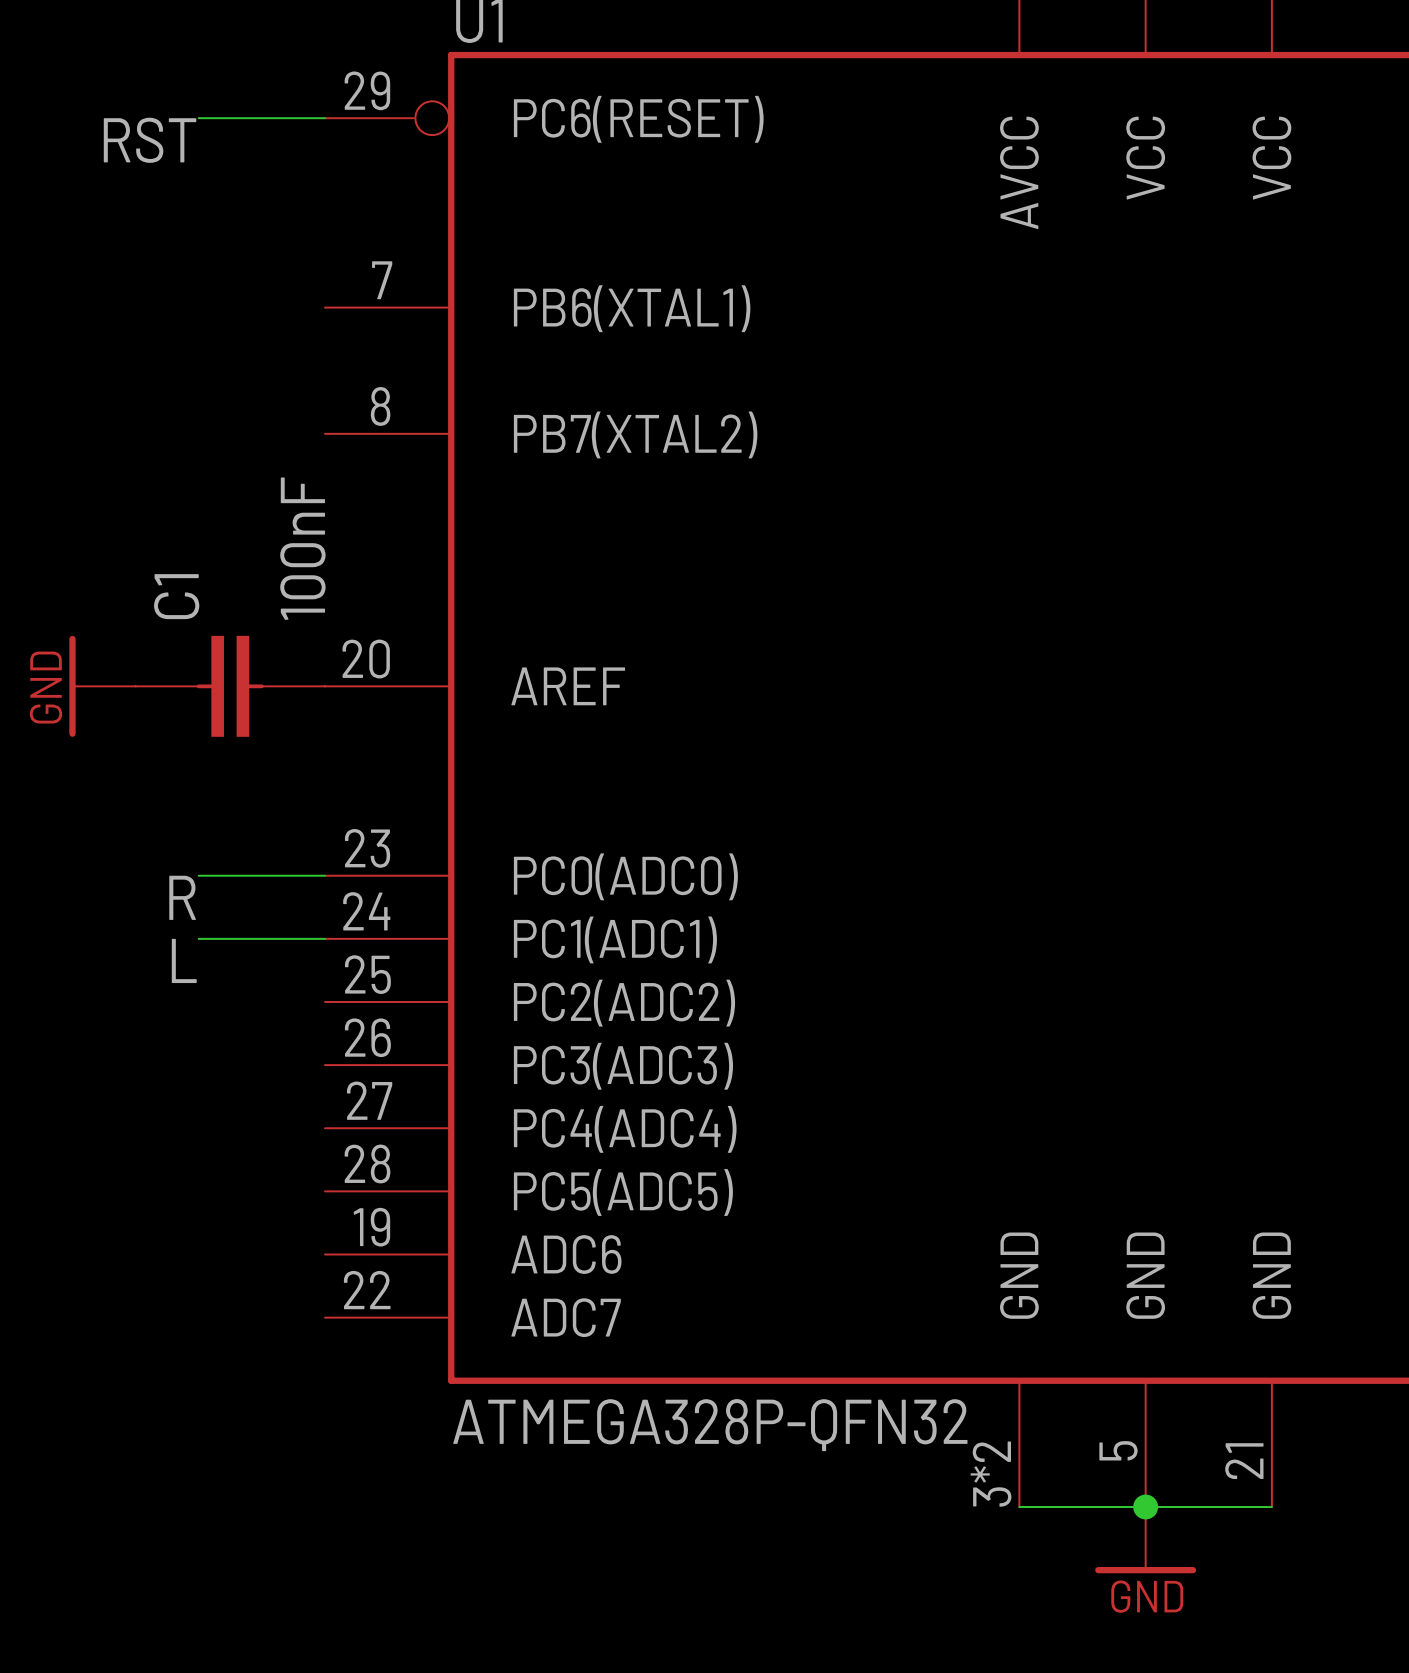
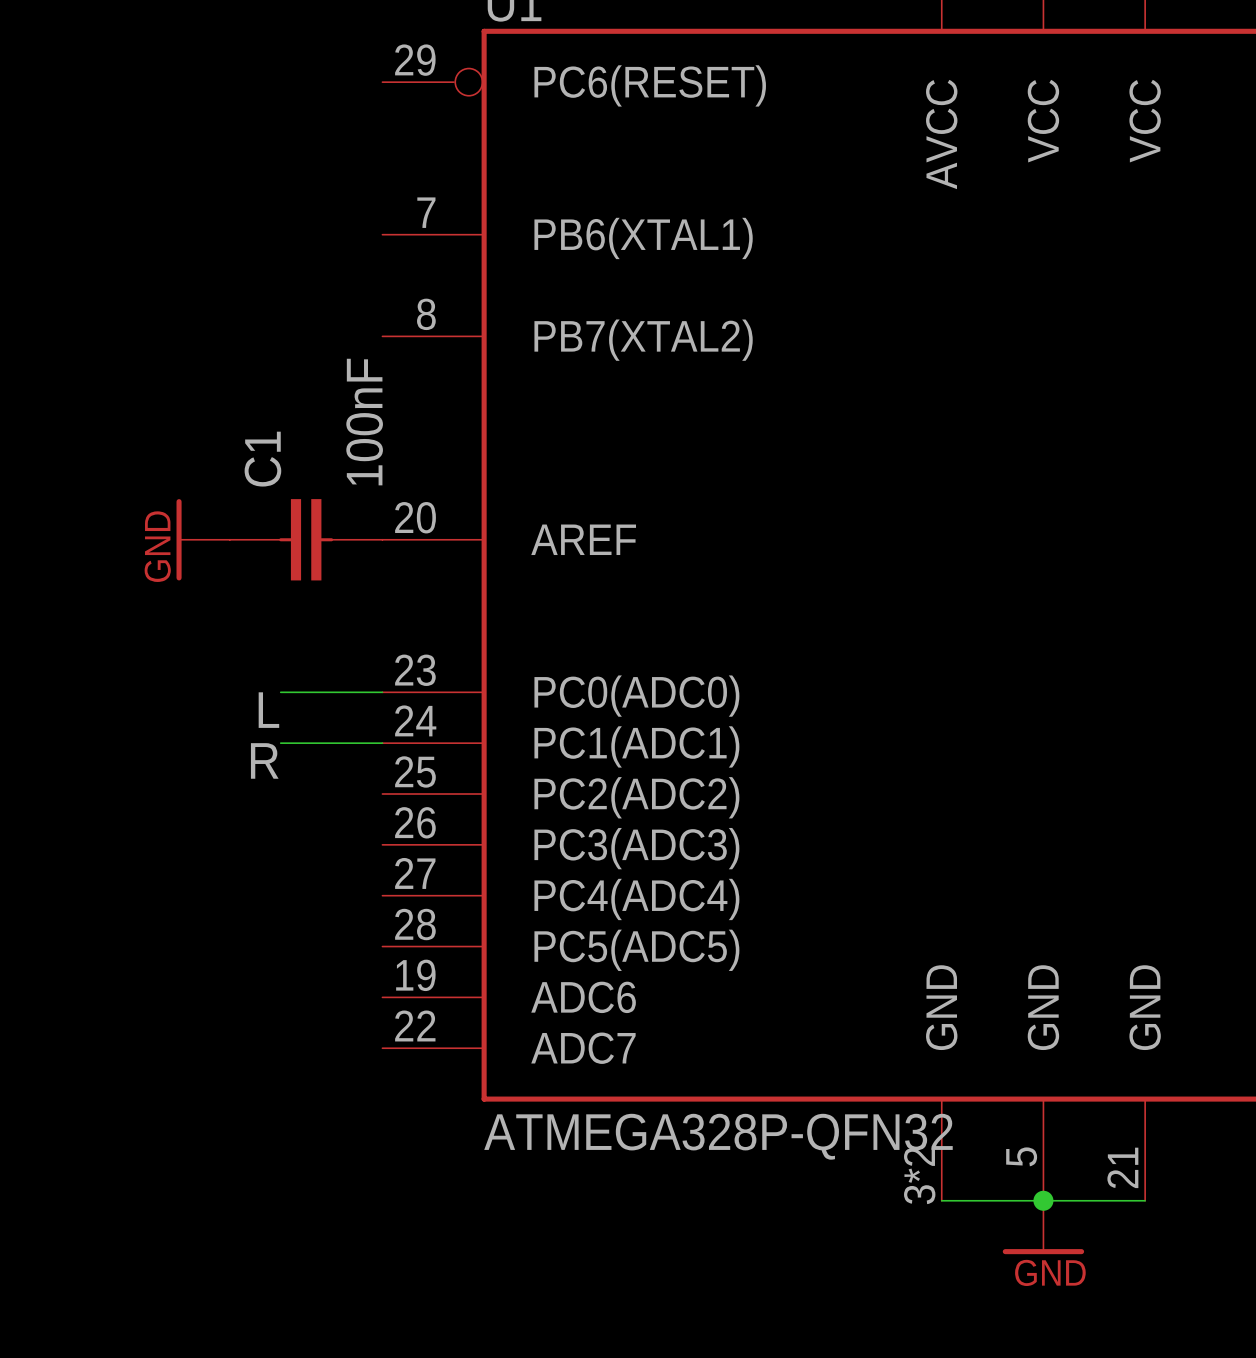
wire: (198, 118) (324, 118) -> none
label: RST (150, 140) -> none
label: R (182, 897) -> L (268, 710)
label: L (184, 960) -> R (264, 760)

